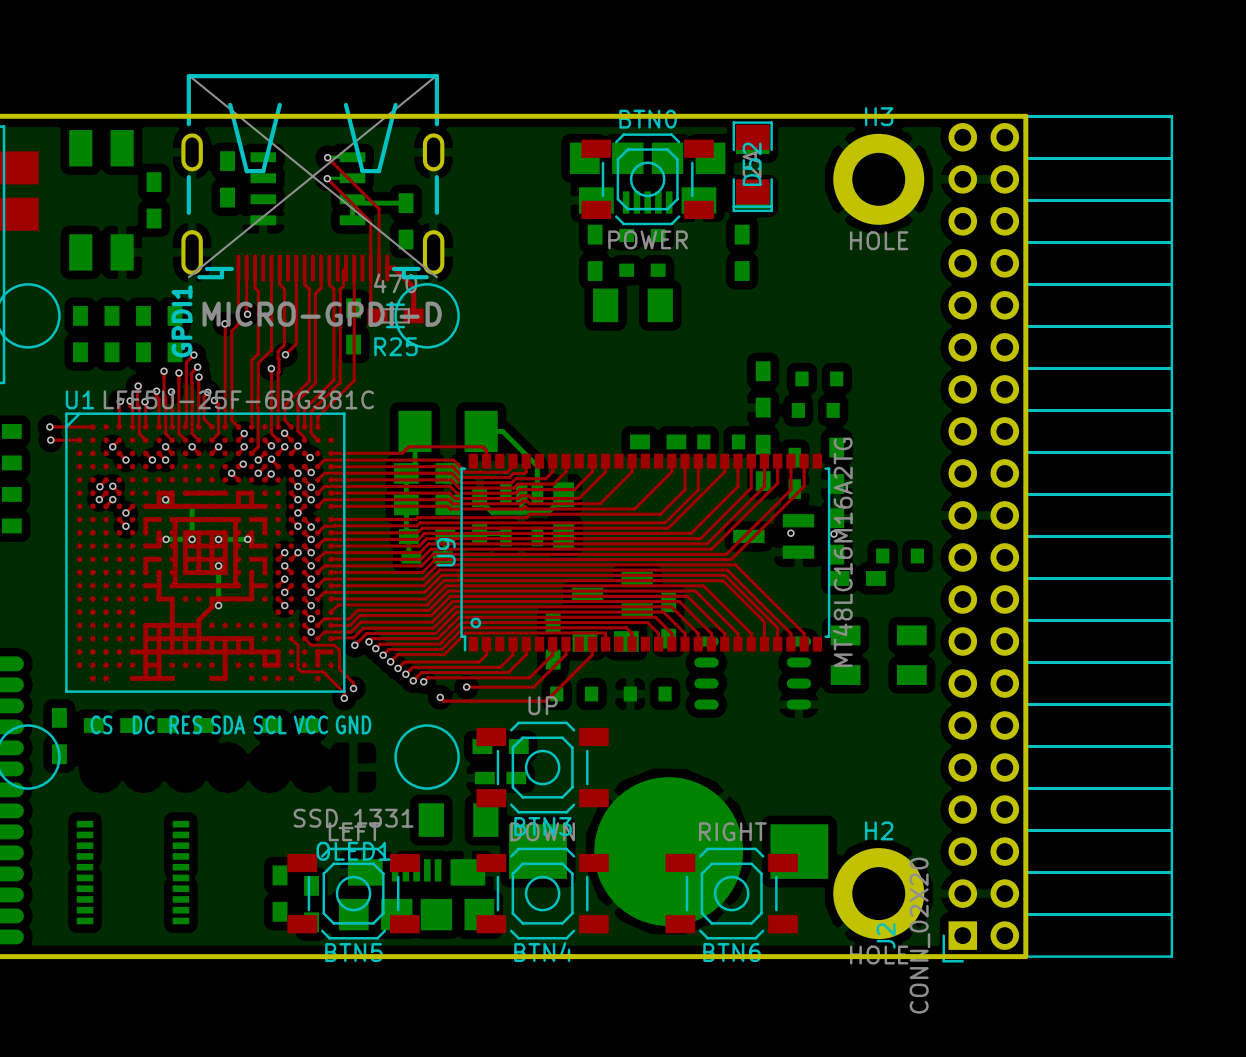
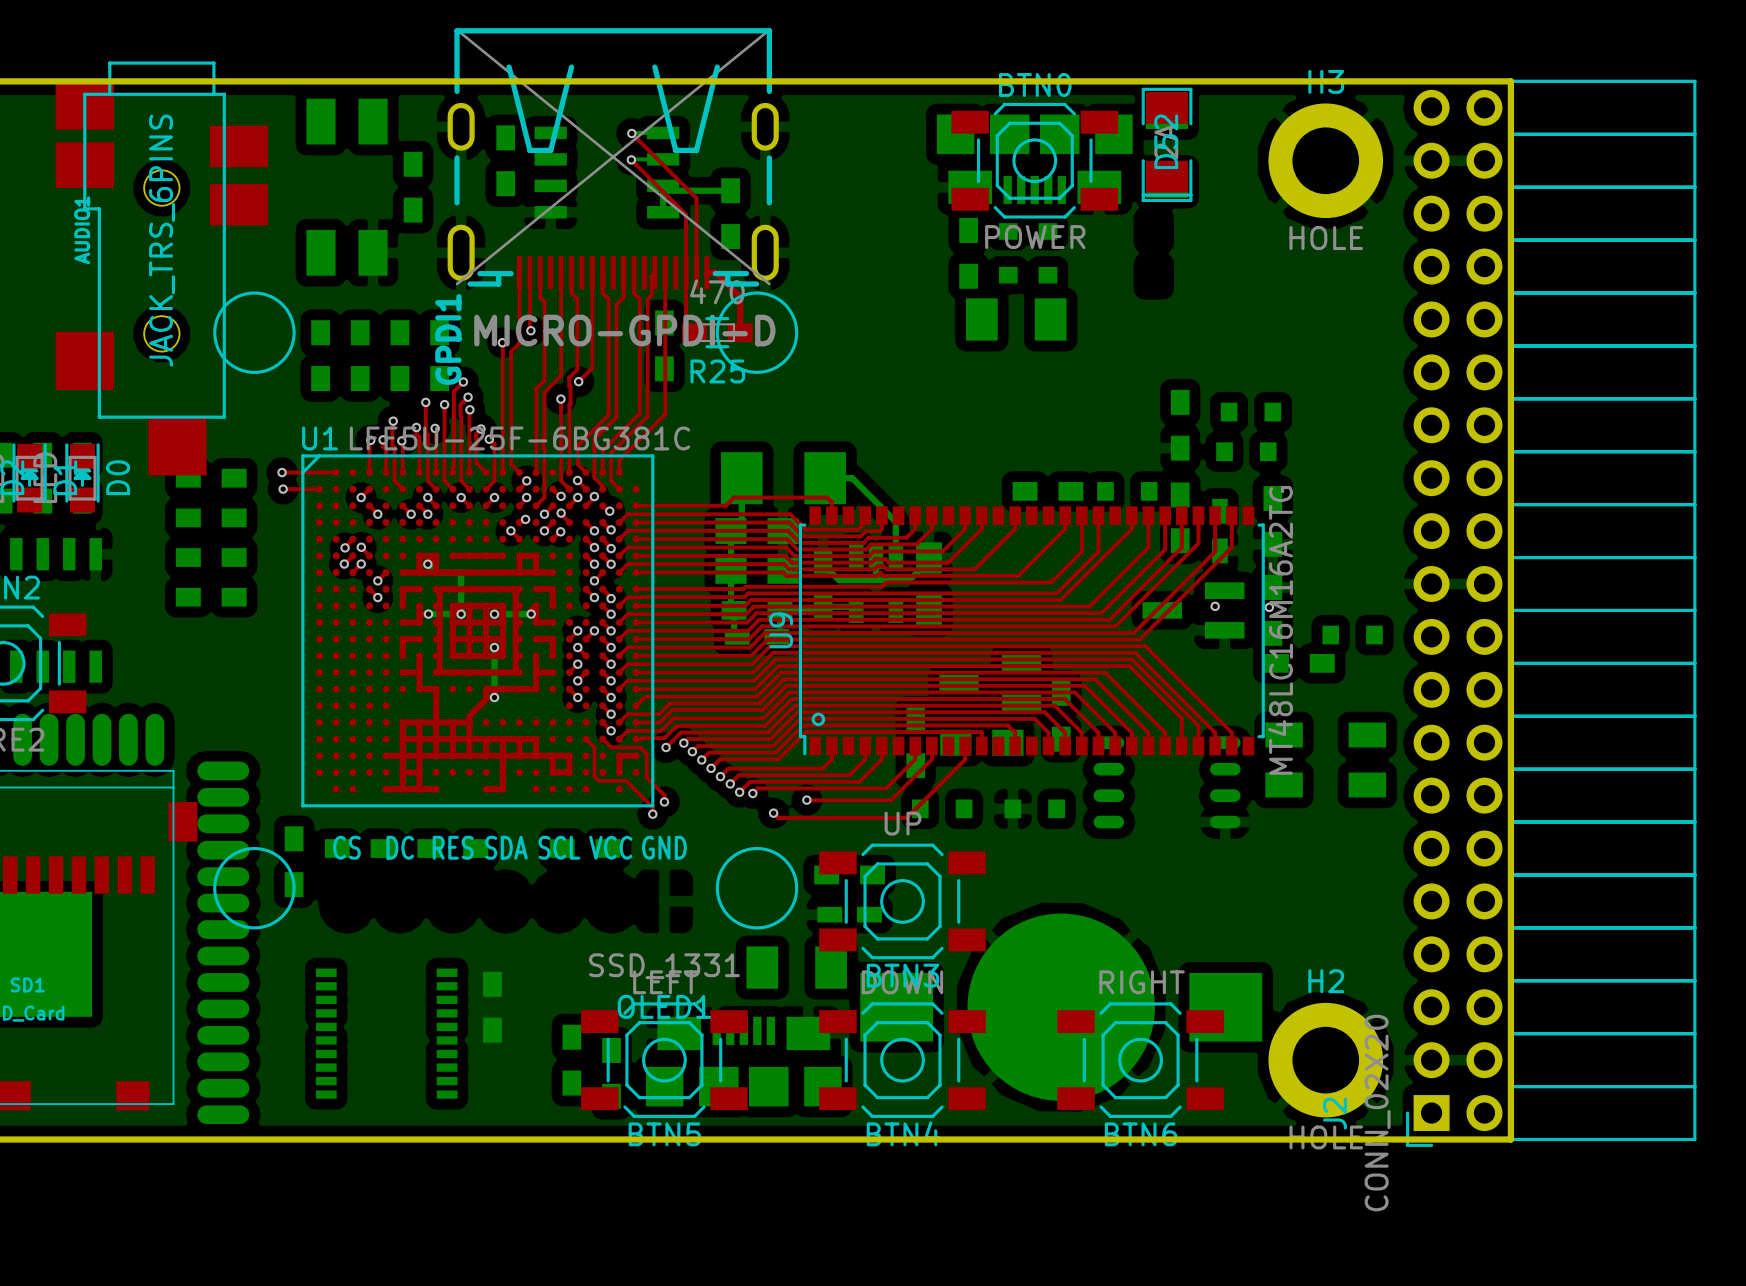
part: (742, 252) -> none
part: none -> (492, 1007)

